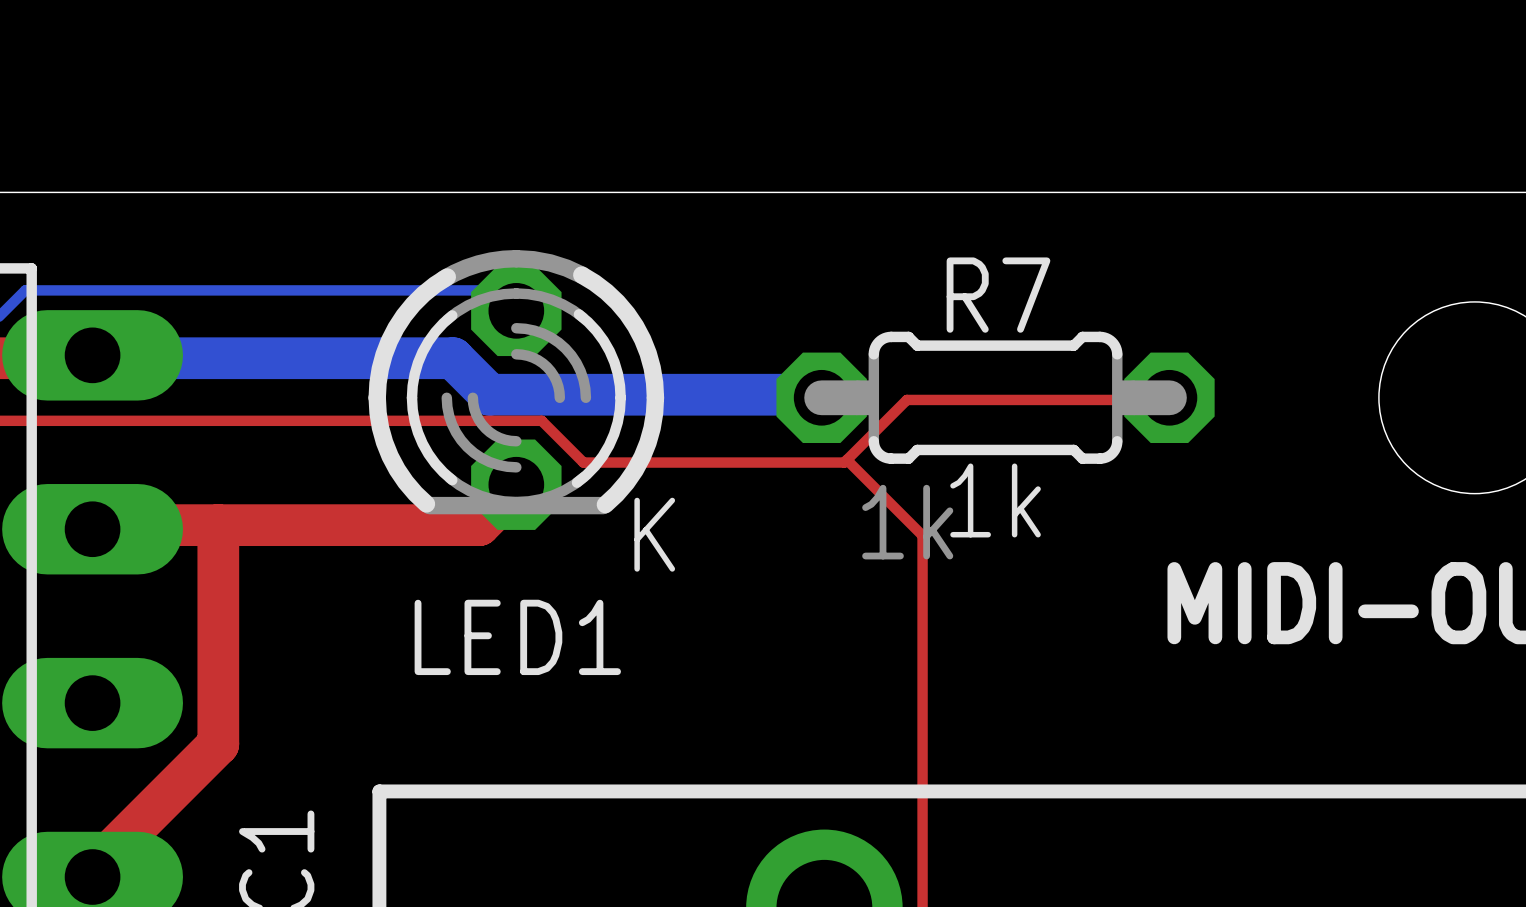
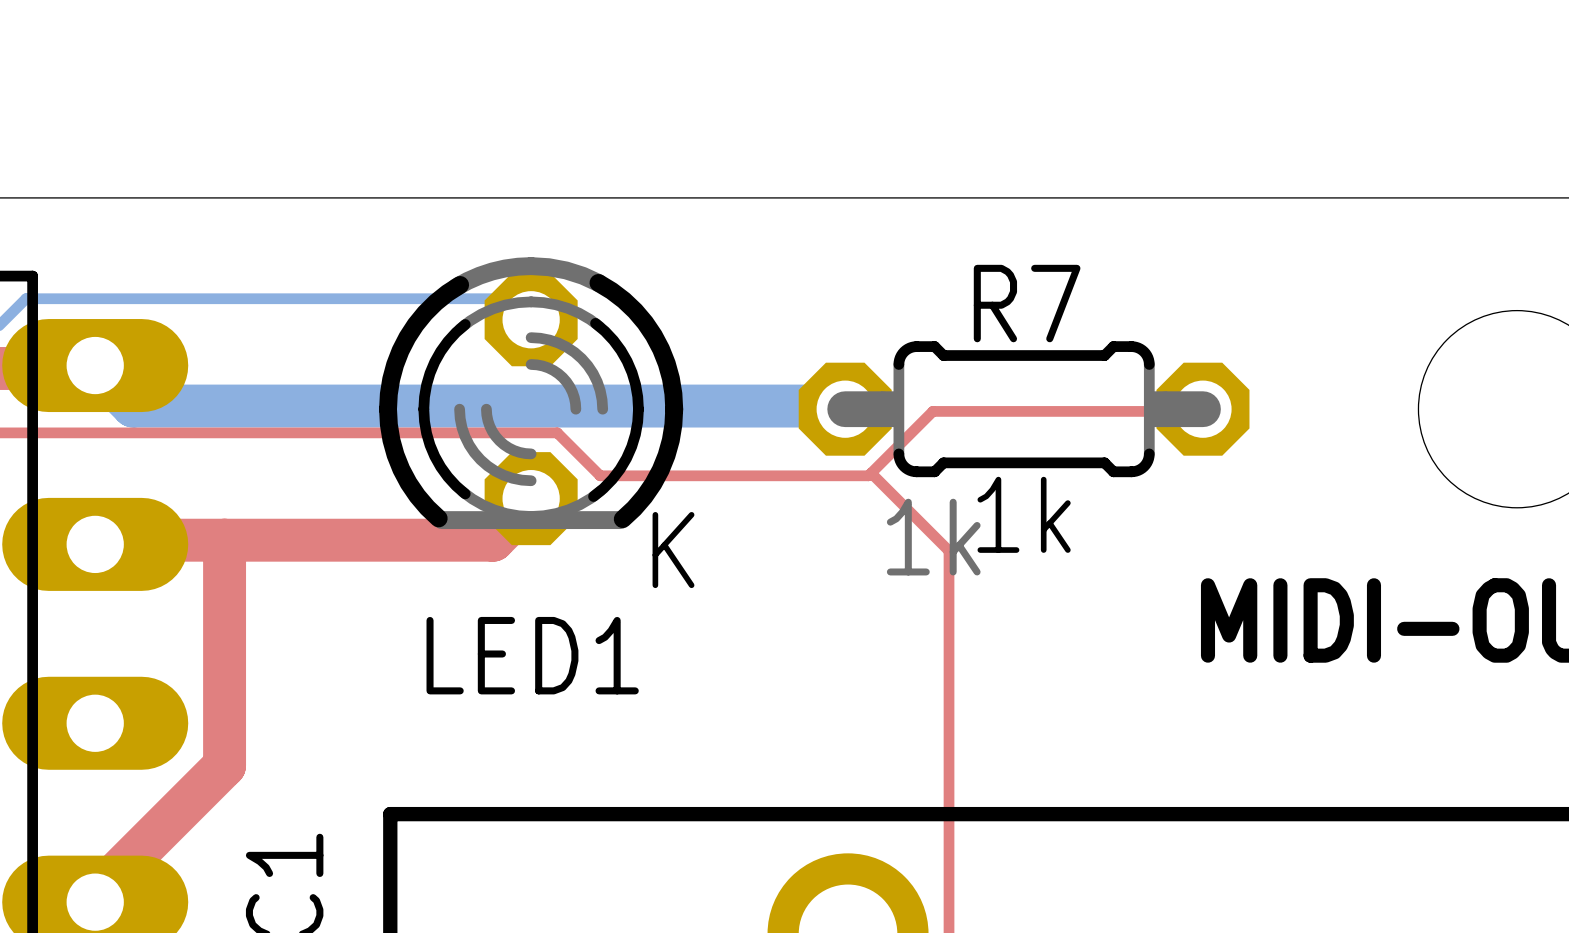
bottom track: (93, 358) (453, 358) (489, 394) -> (95, 368) (133, 406) (503, 406)

